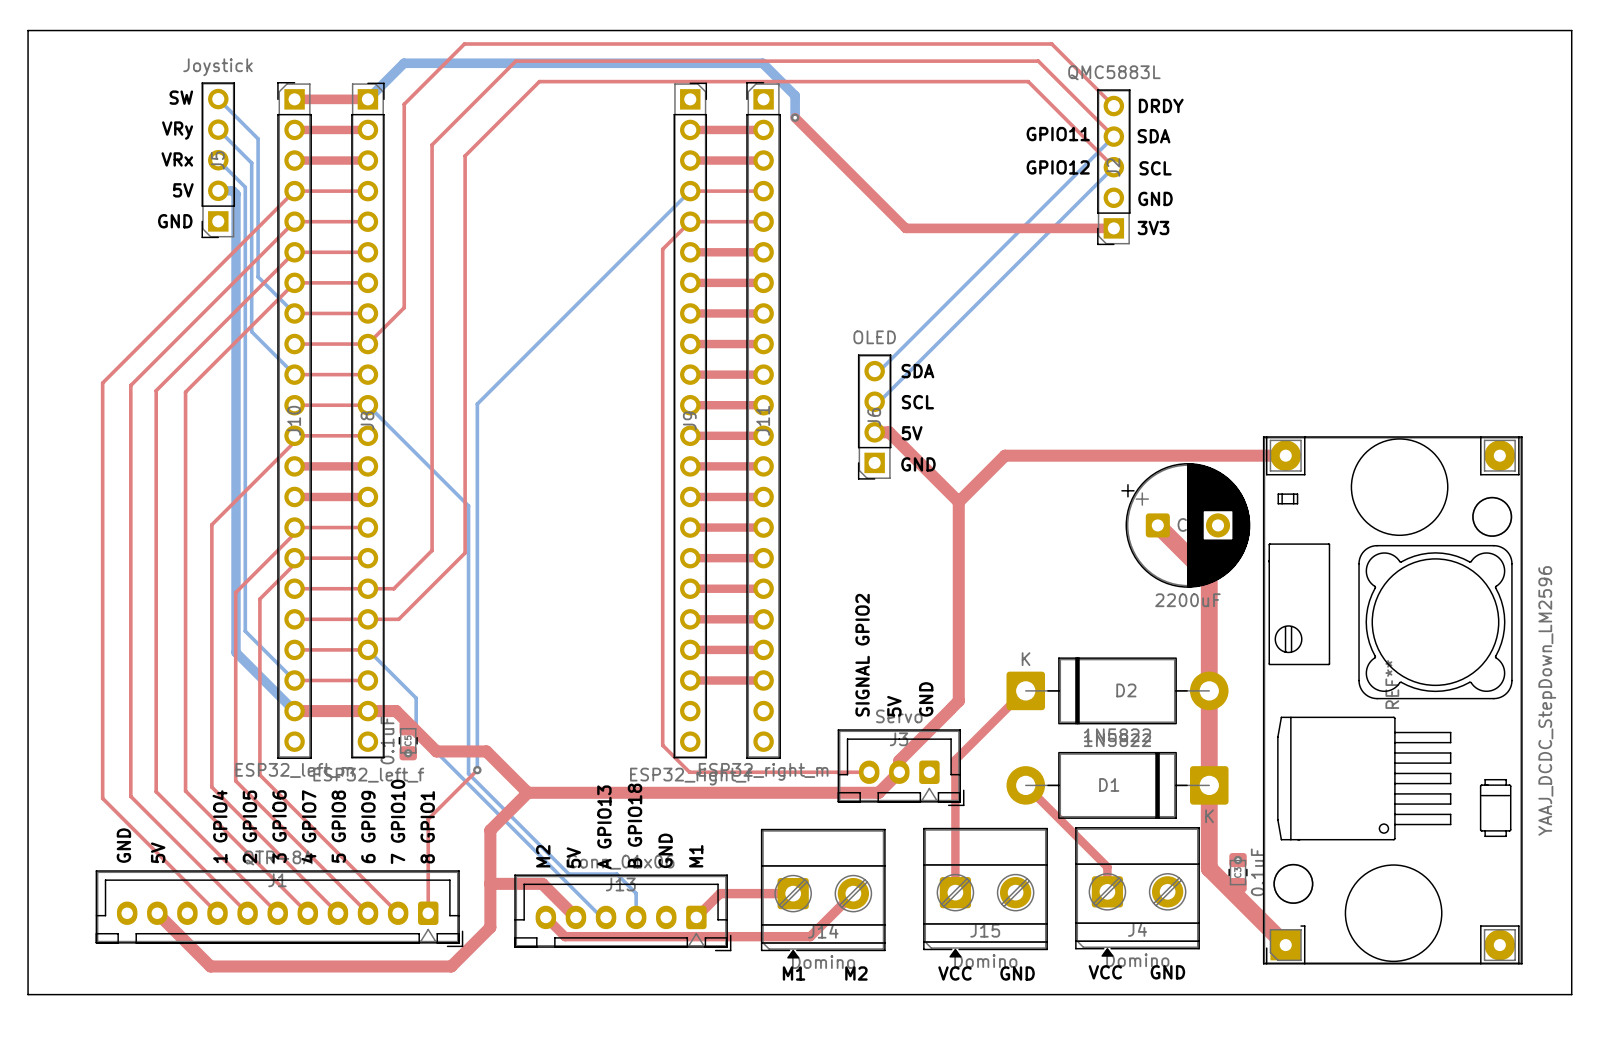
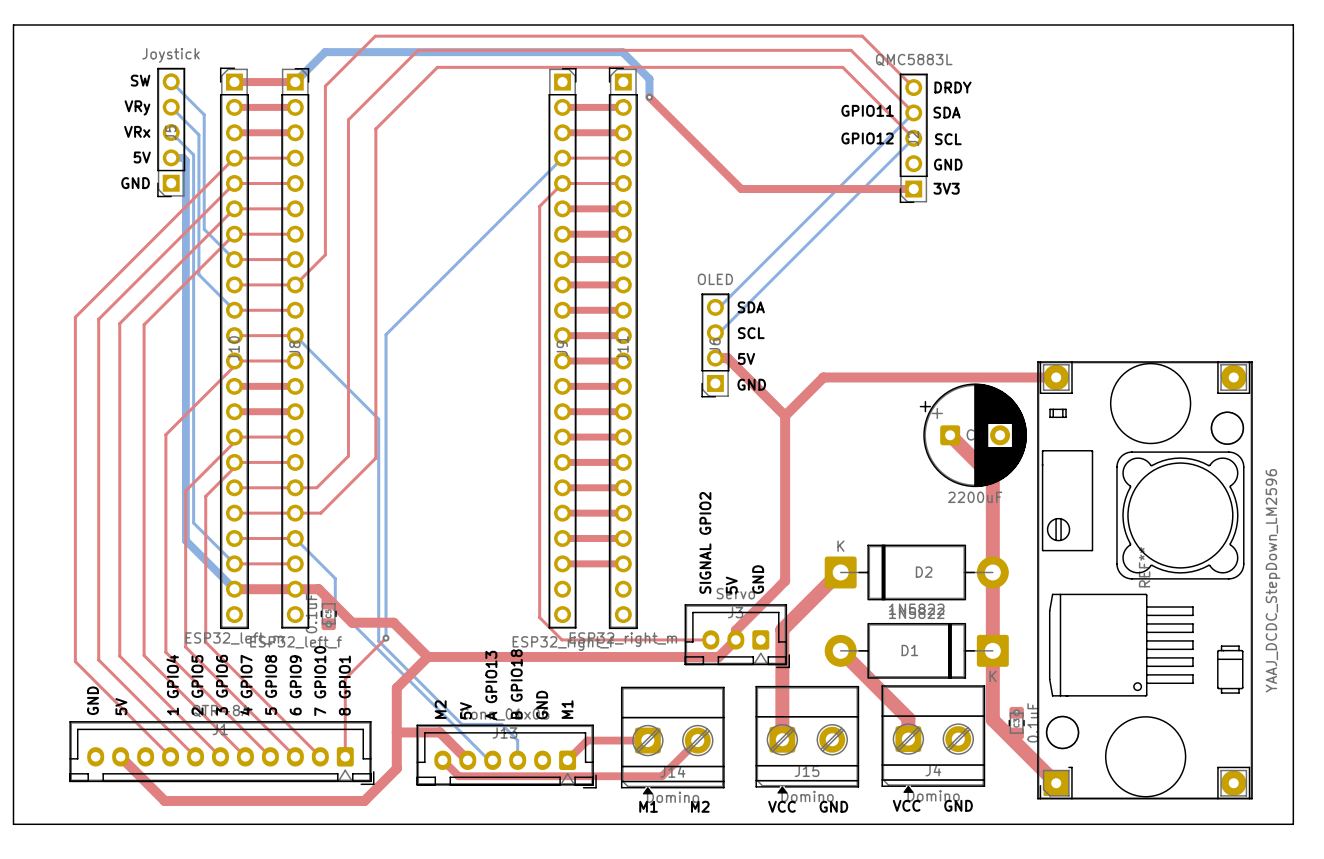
top track width: thin (1025, 689) (955, 760) (955, 892) -> thick (840, 571) (782, 629) (782, 739)
top track width: thin (1025, 785) (1107, 867) (1107, 891) -> thick (840, 650) (908, 718) (908, 739)

